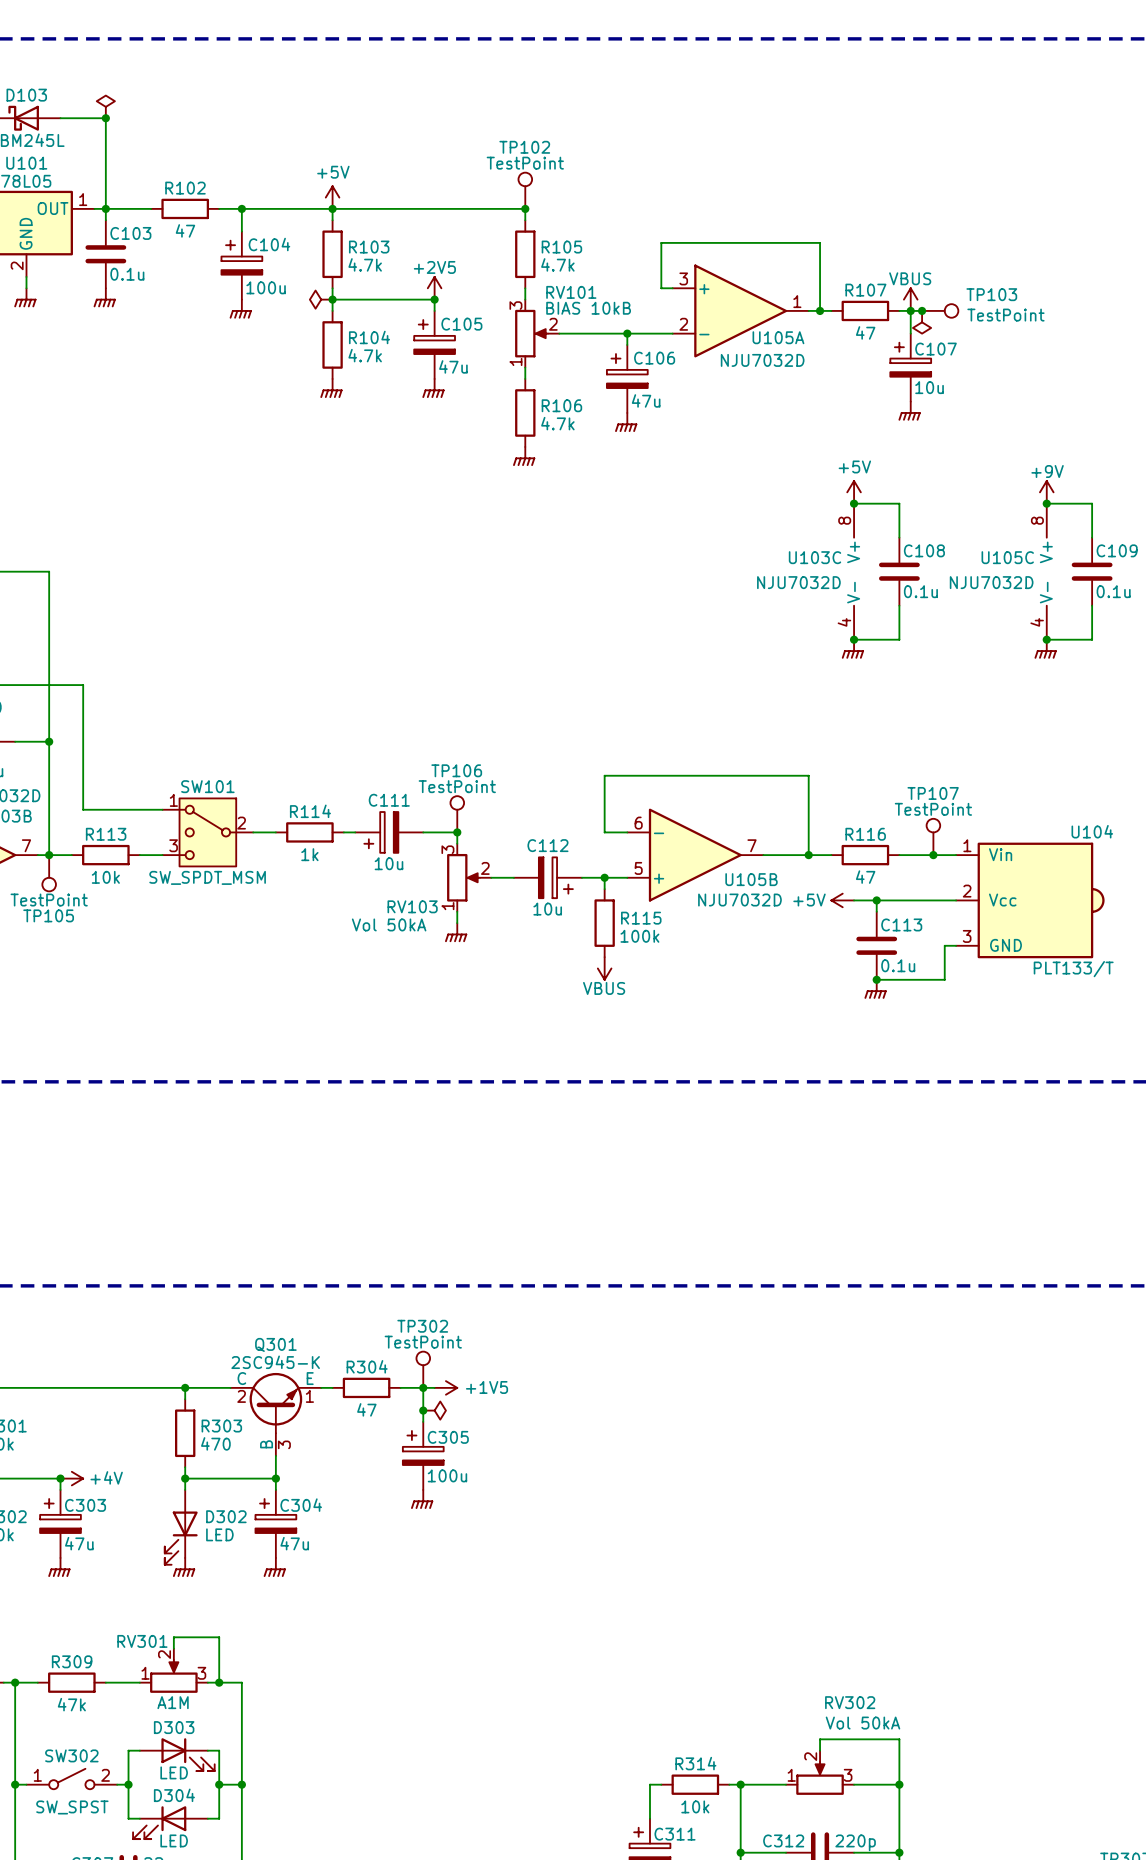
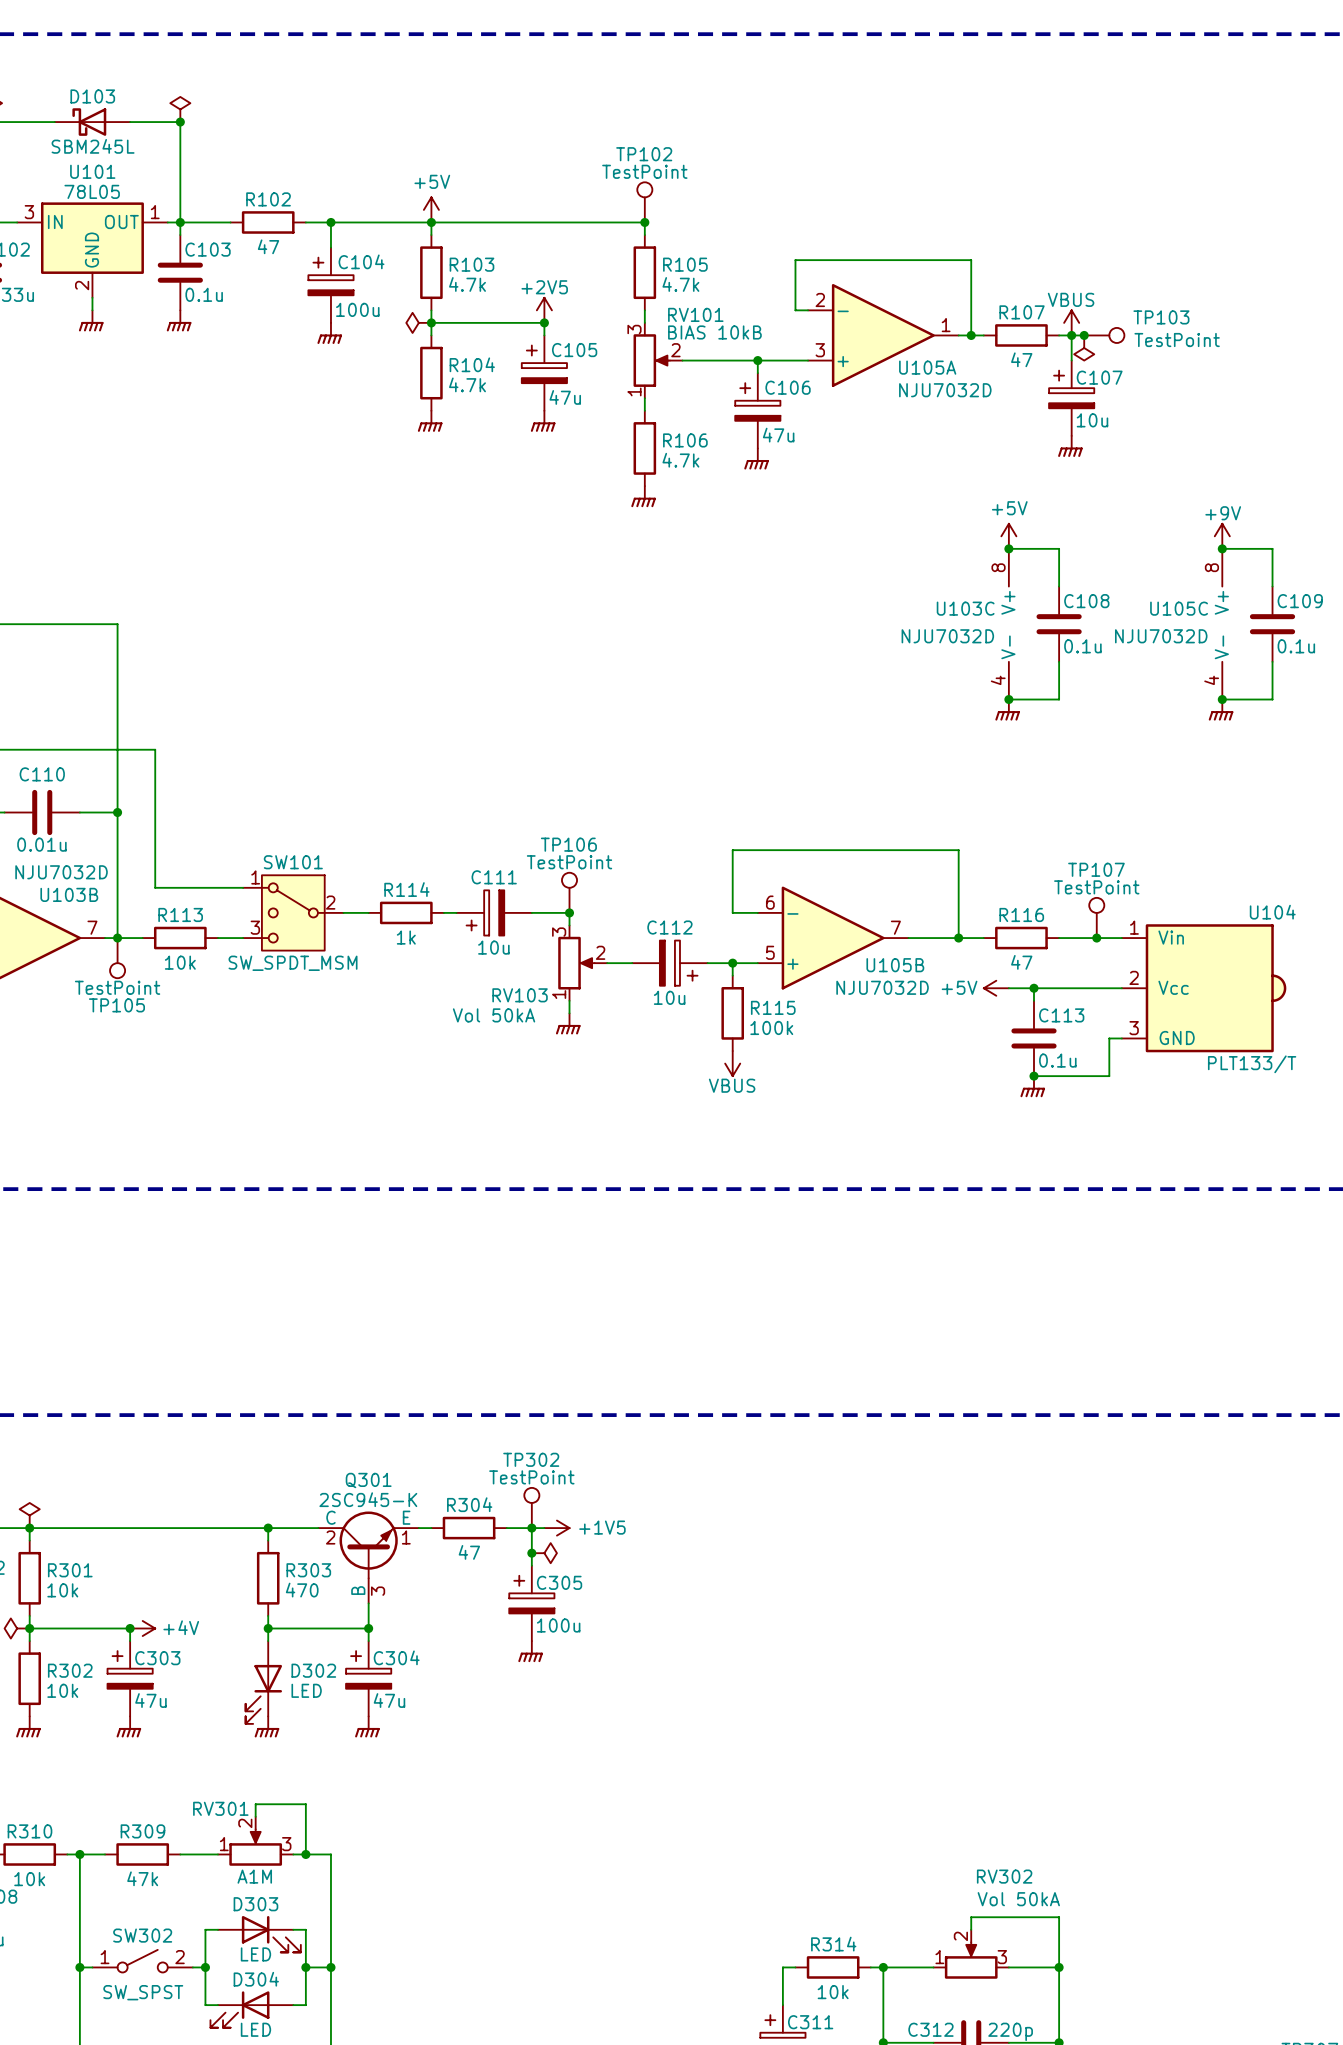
U105A flip: as is (740, 310) -> up-down (883, 335)
U105A value position: NJU7032D (762, 360) -> NJU7032D (945, 390)

